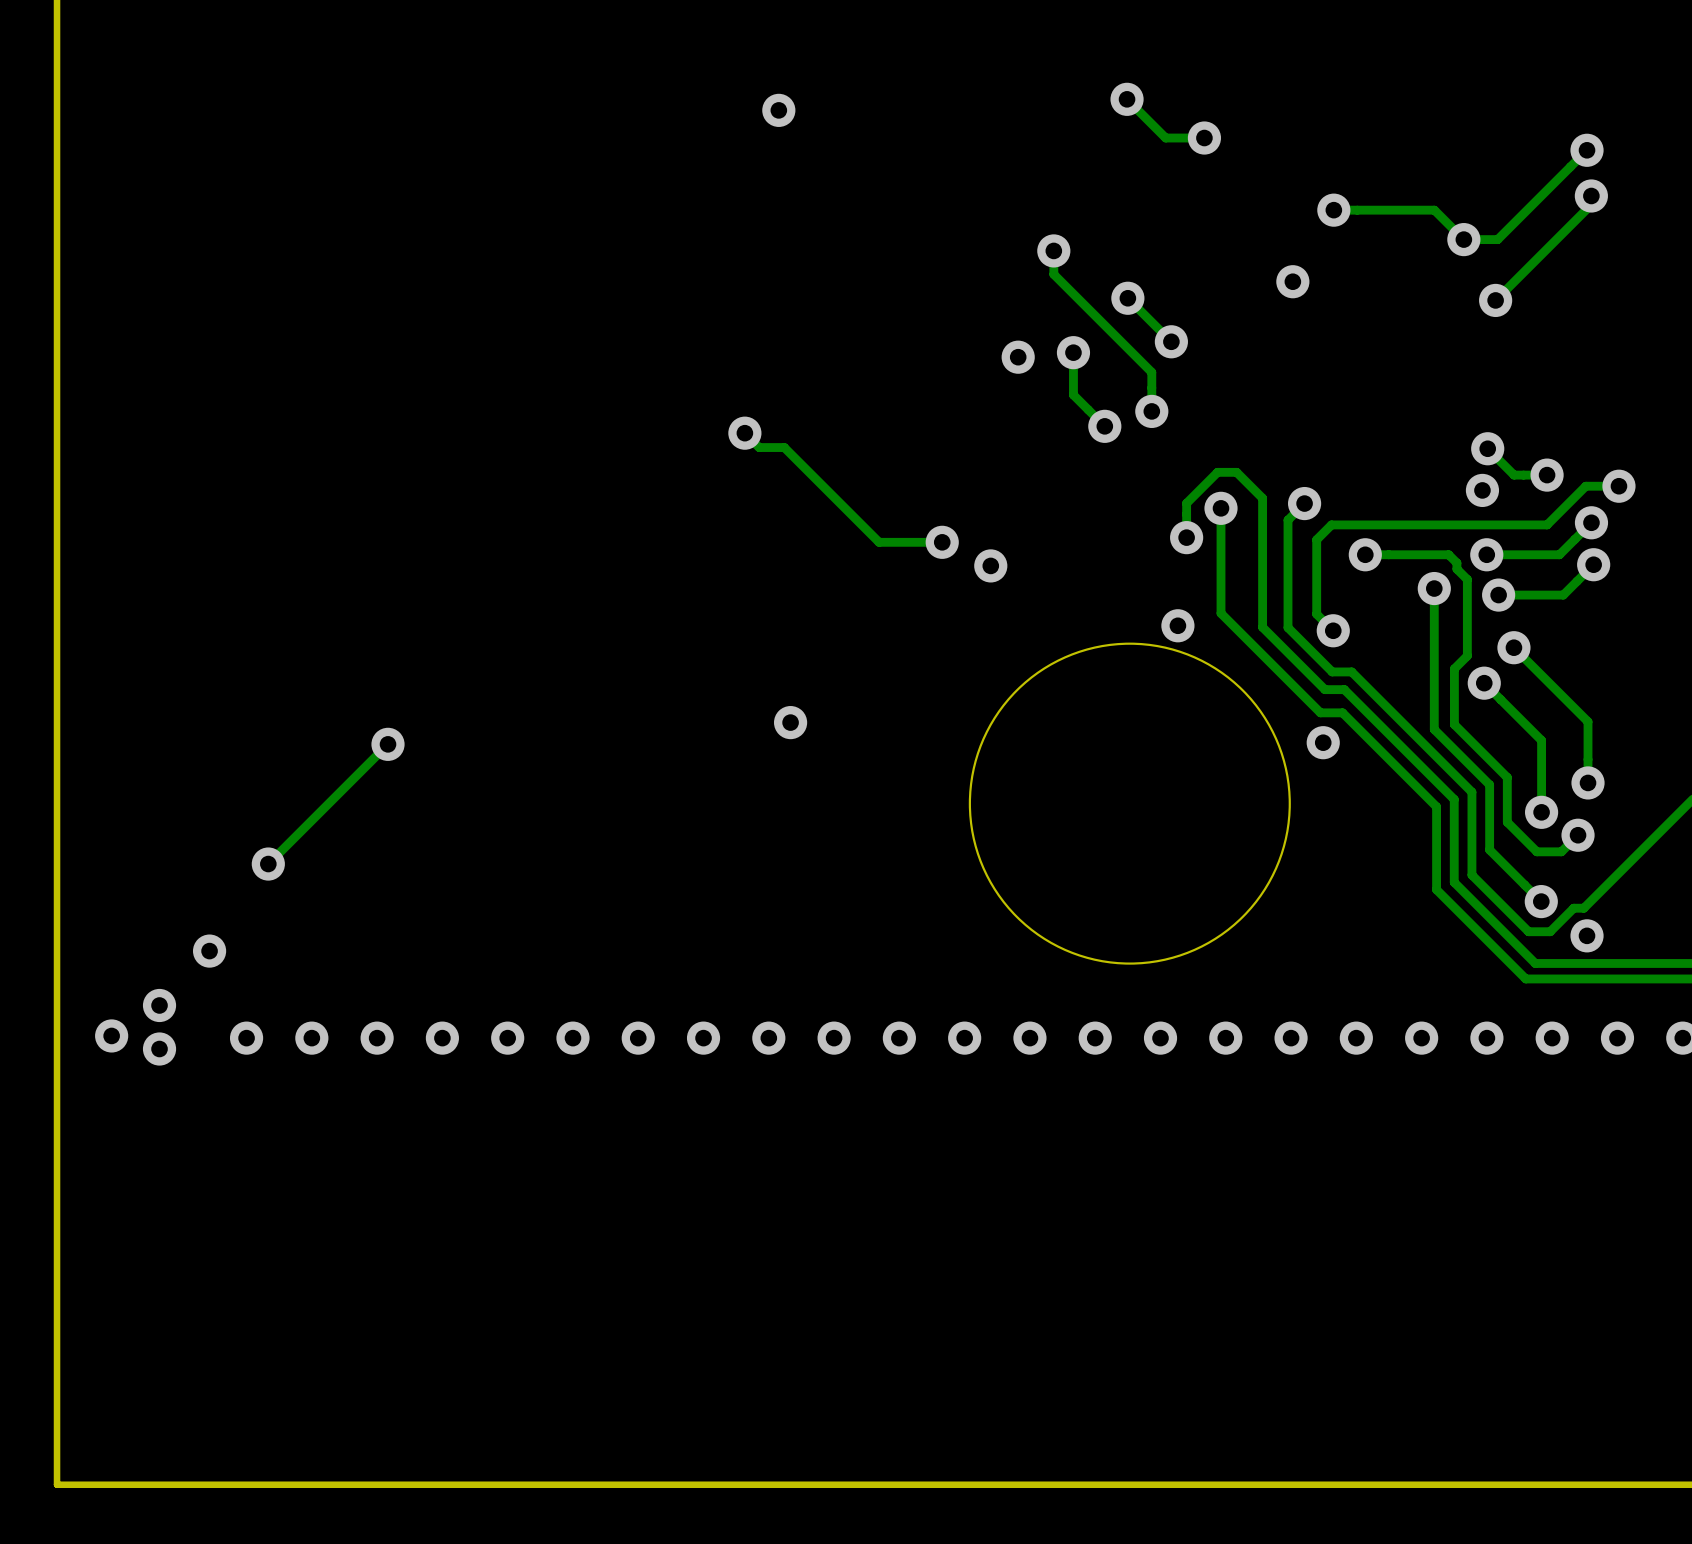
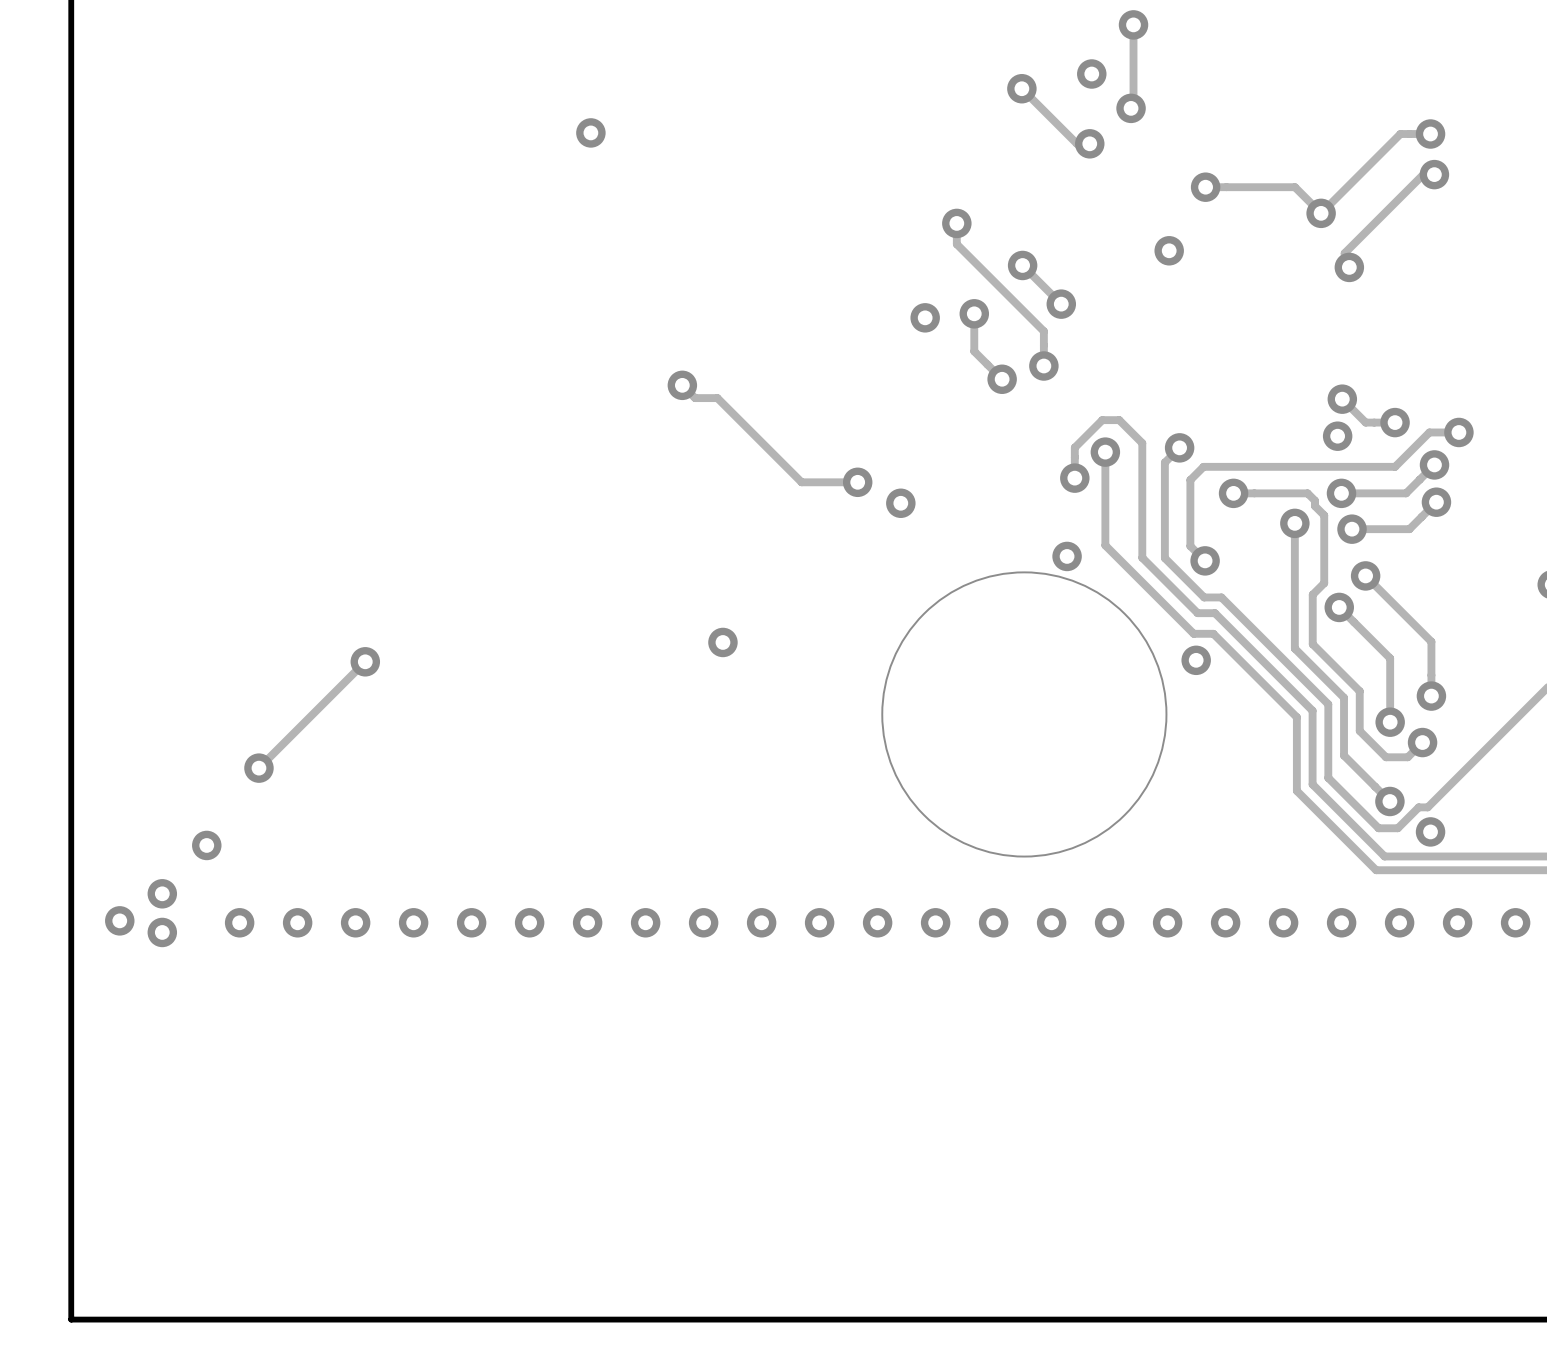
track: none -> (1133, 24) (1133, 105) (1131, 108)
via: none -> (1133, 24)
via: none -> (1091, 74)
via position: (778, 110) -> (590, 132)
via: none -> (1131, 108)
track: (1204, 138) (1165, 138) -> (1089, 143) (1076, 143) (1056, 123)
via position: (1204, 138) -> (1089, 143)
track: (1587, 150) (1497, 239) (1463, 239) -> (1430, 134) (1400, 134) (1321, 213)
track: none -> (1428, 169) (1344, 253) (1344, 272)
track: (1591, 195) (1591, 204) (1495, 300) -> none

